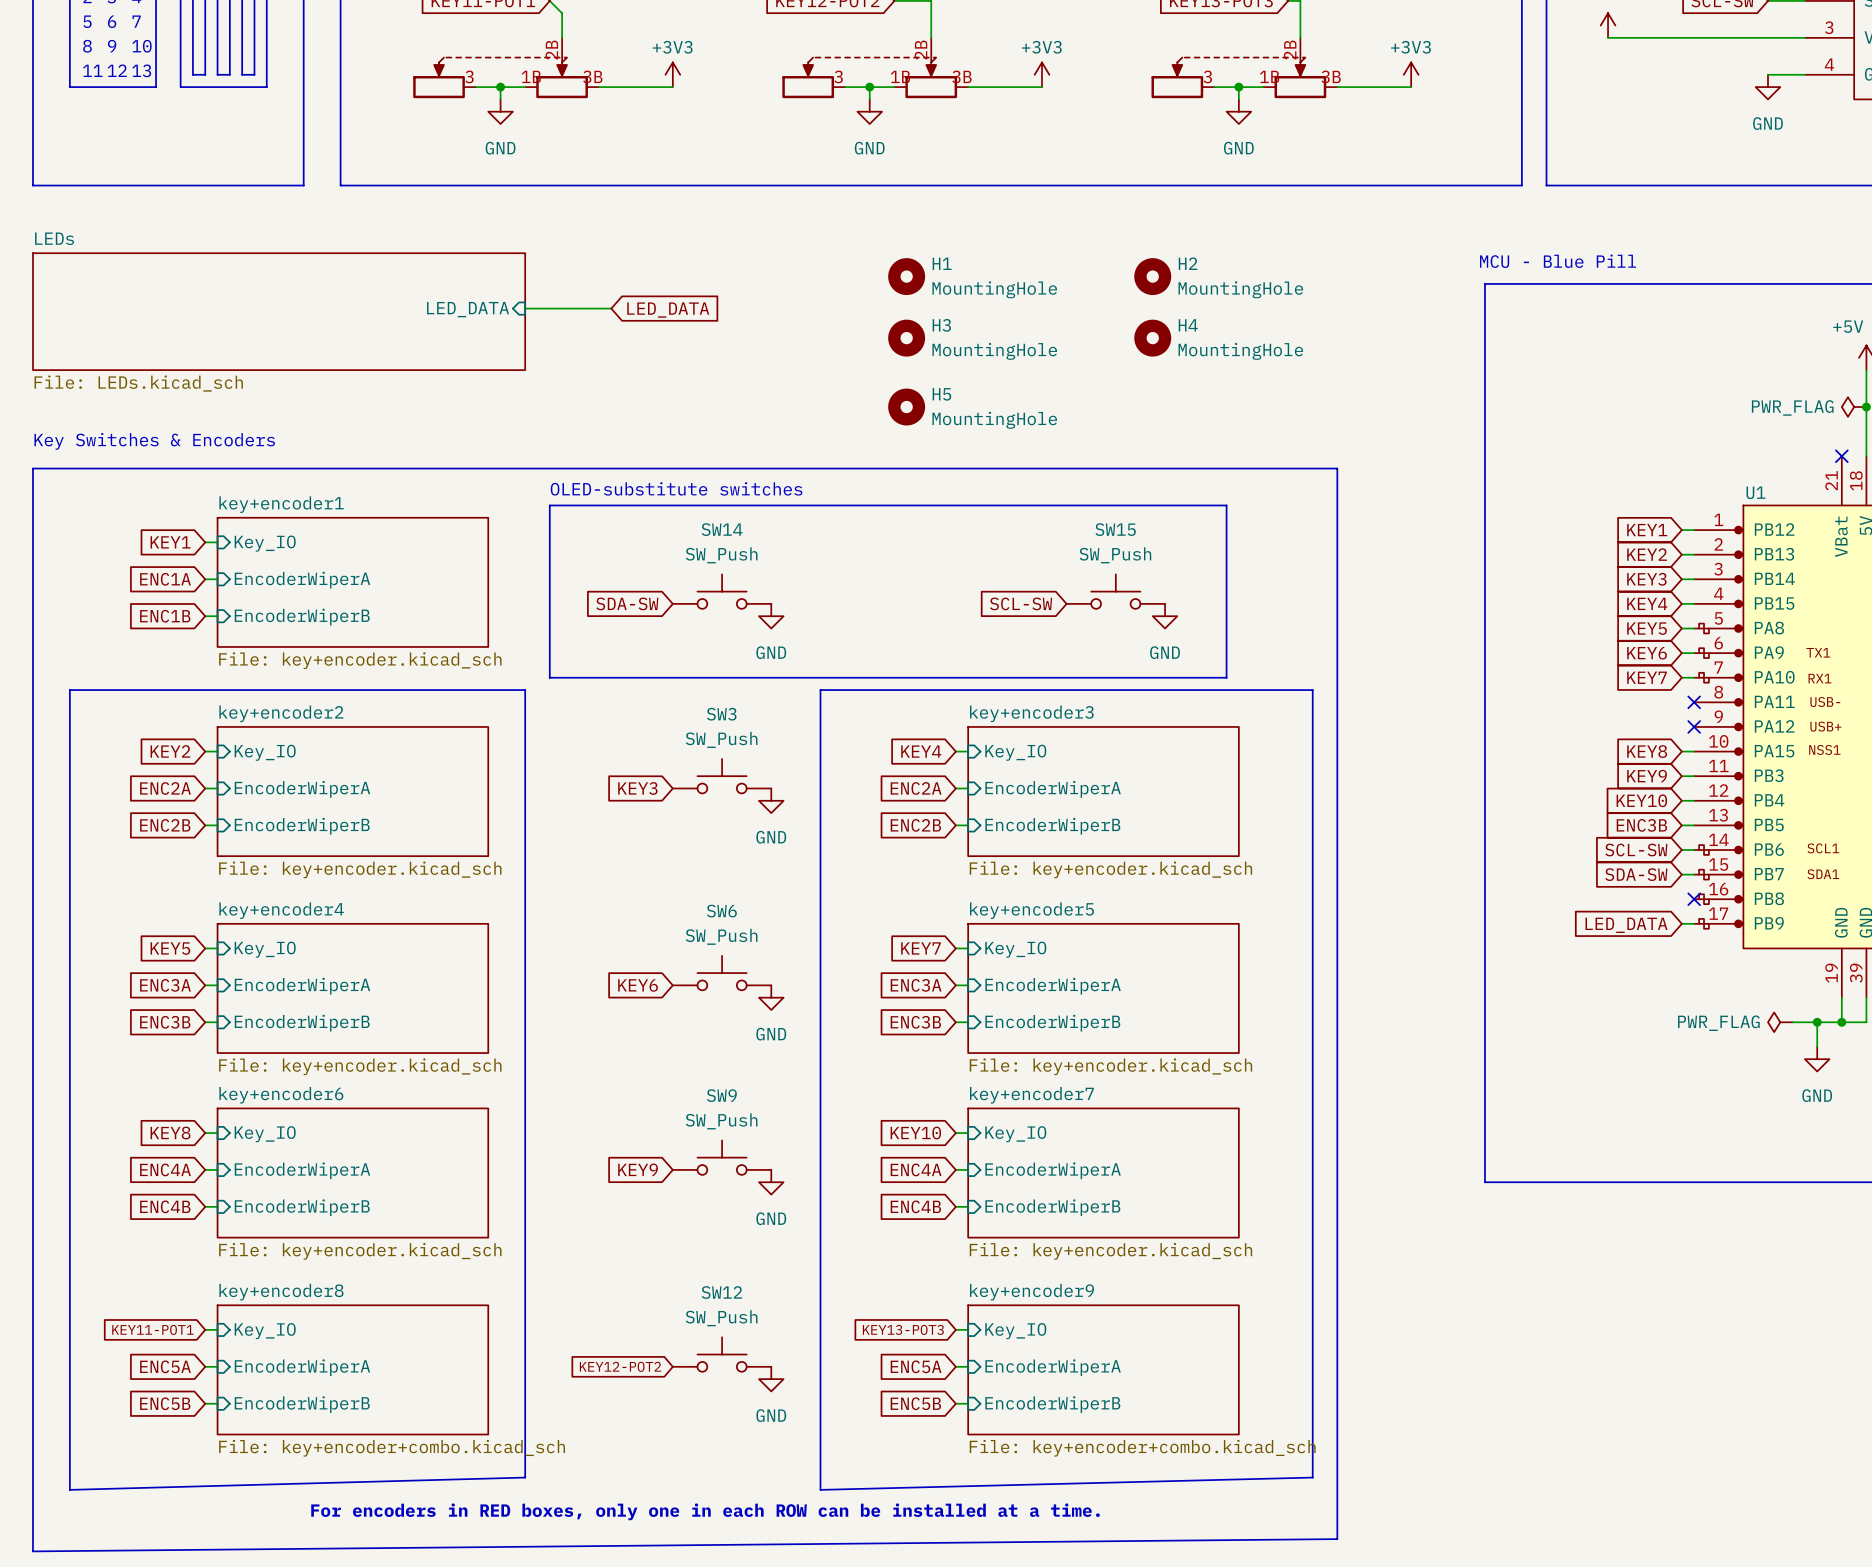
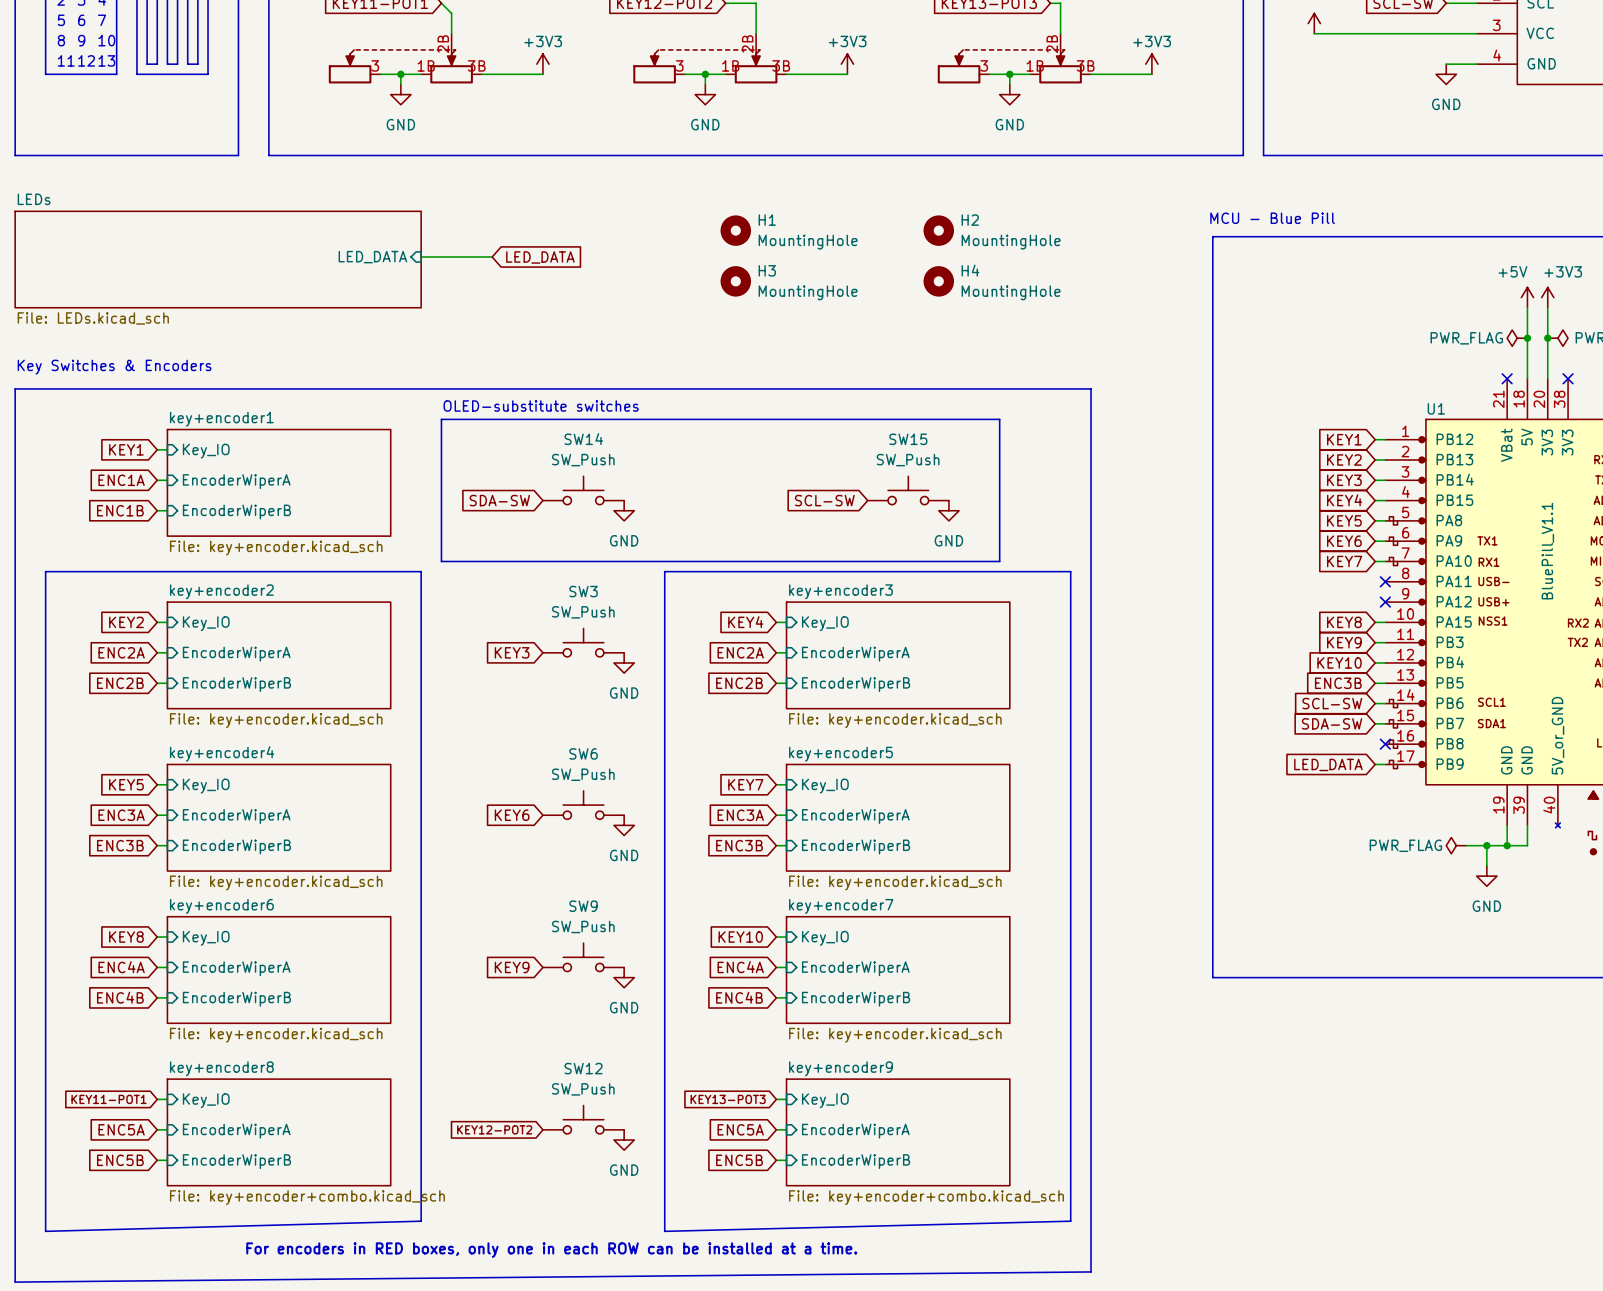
H5: MountingHole (906, 407) -> none

